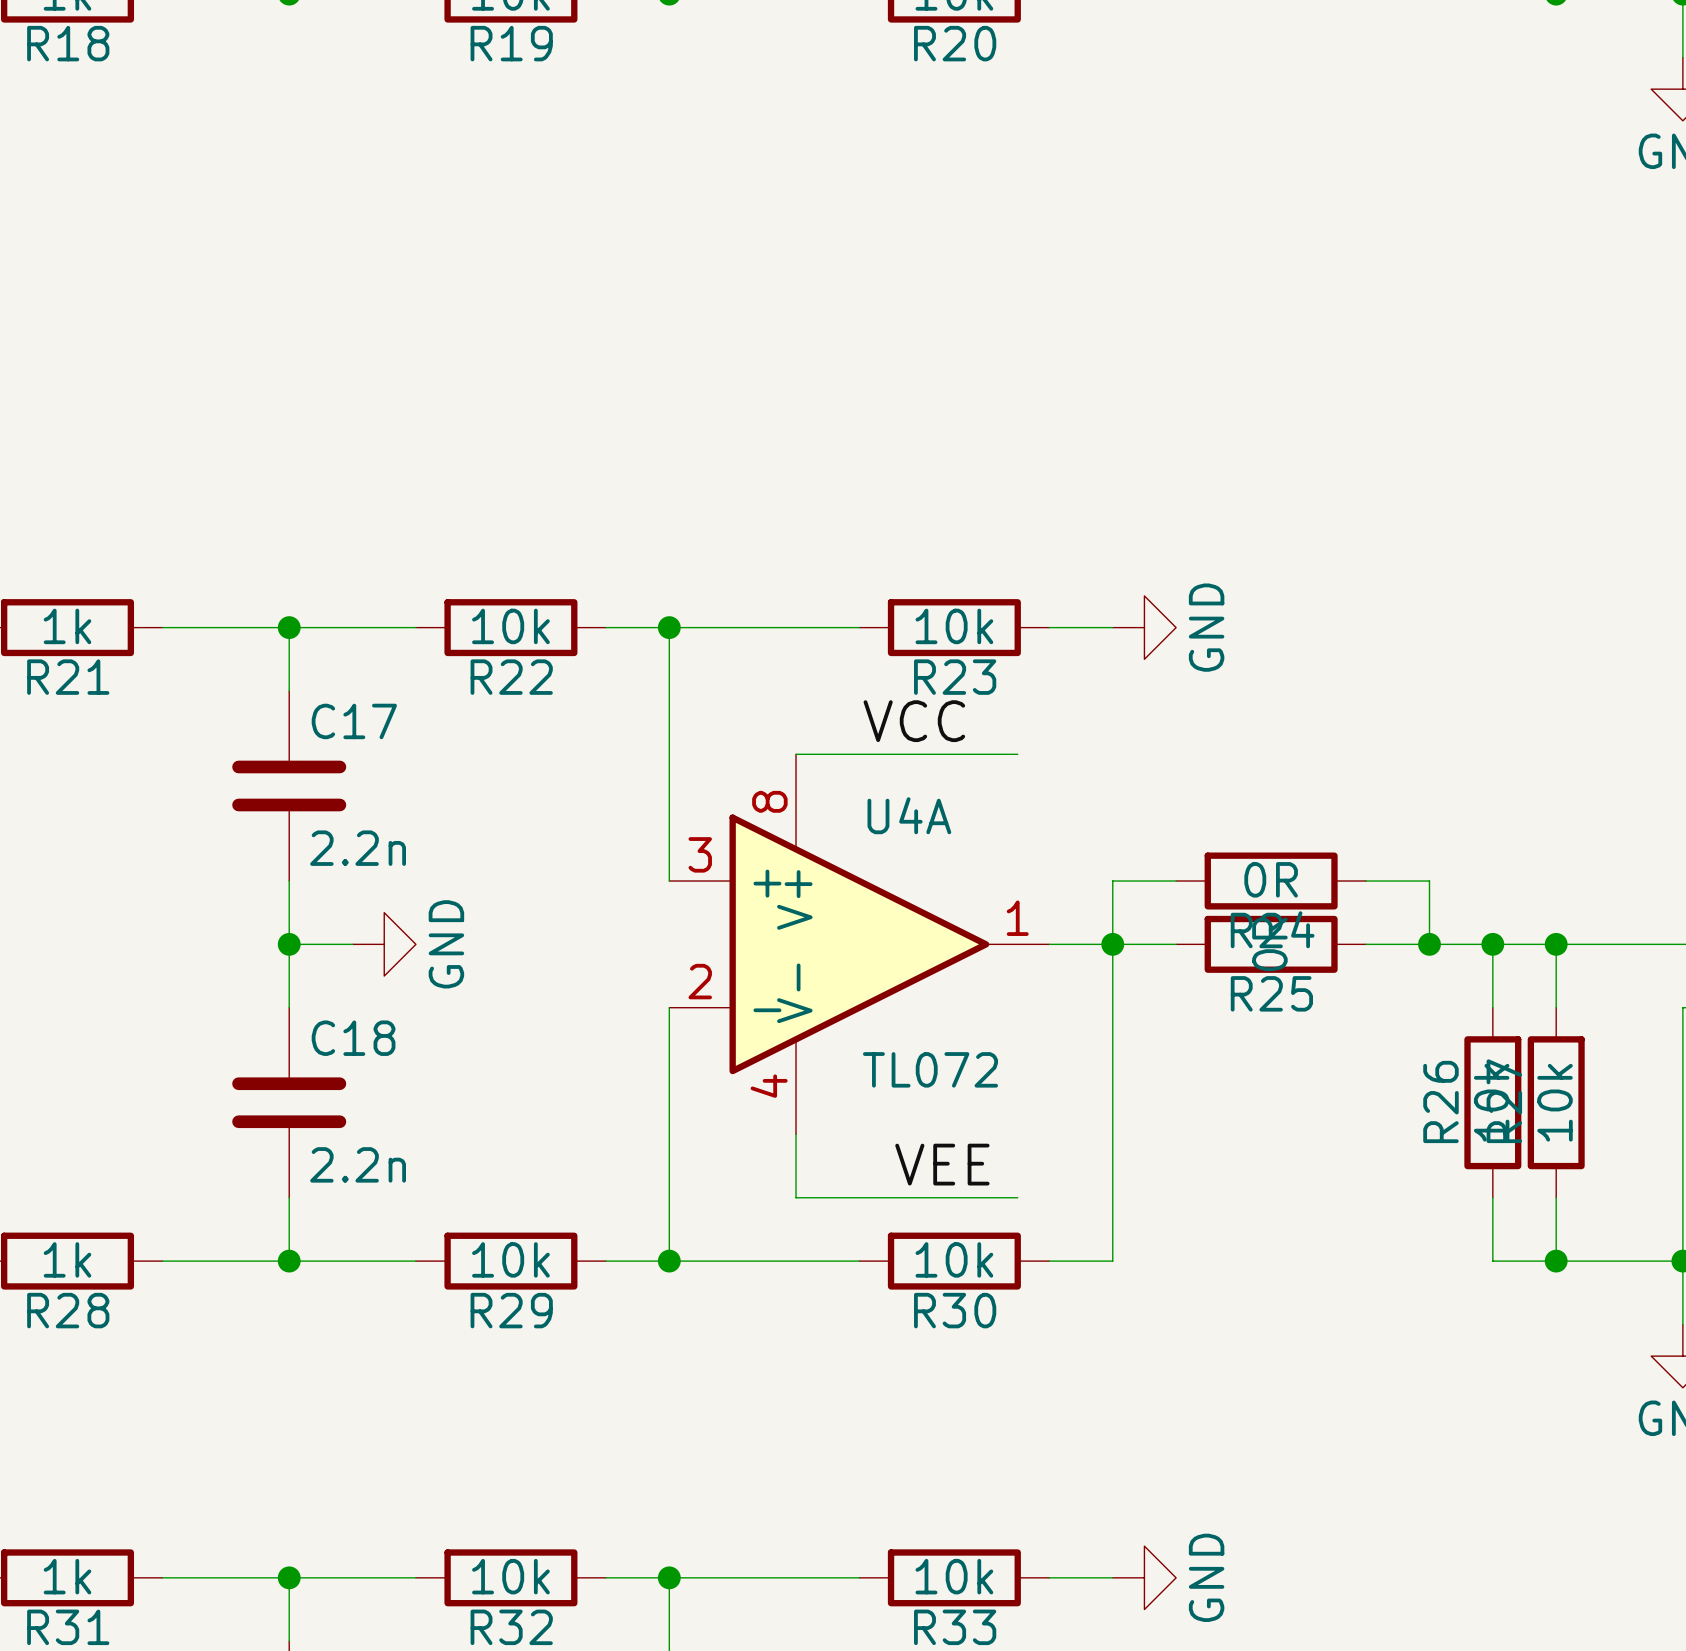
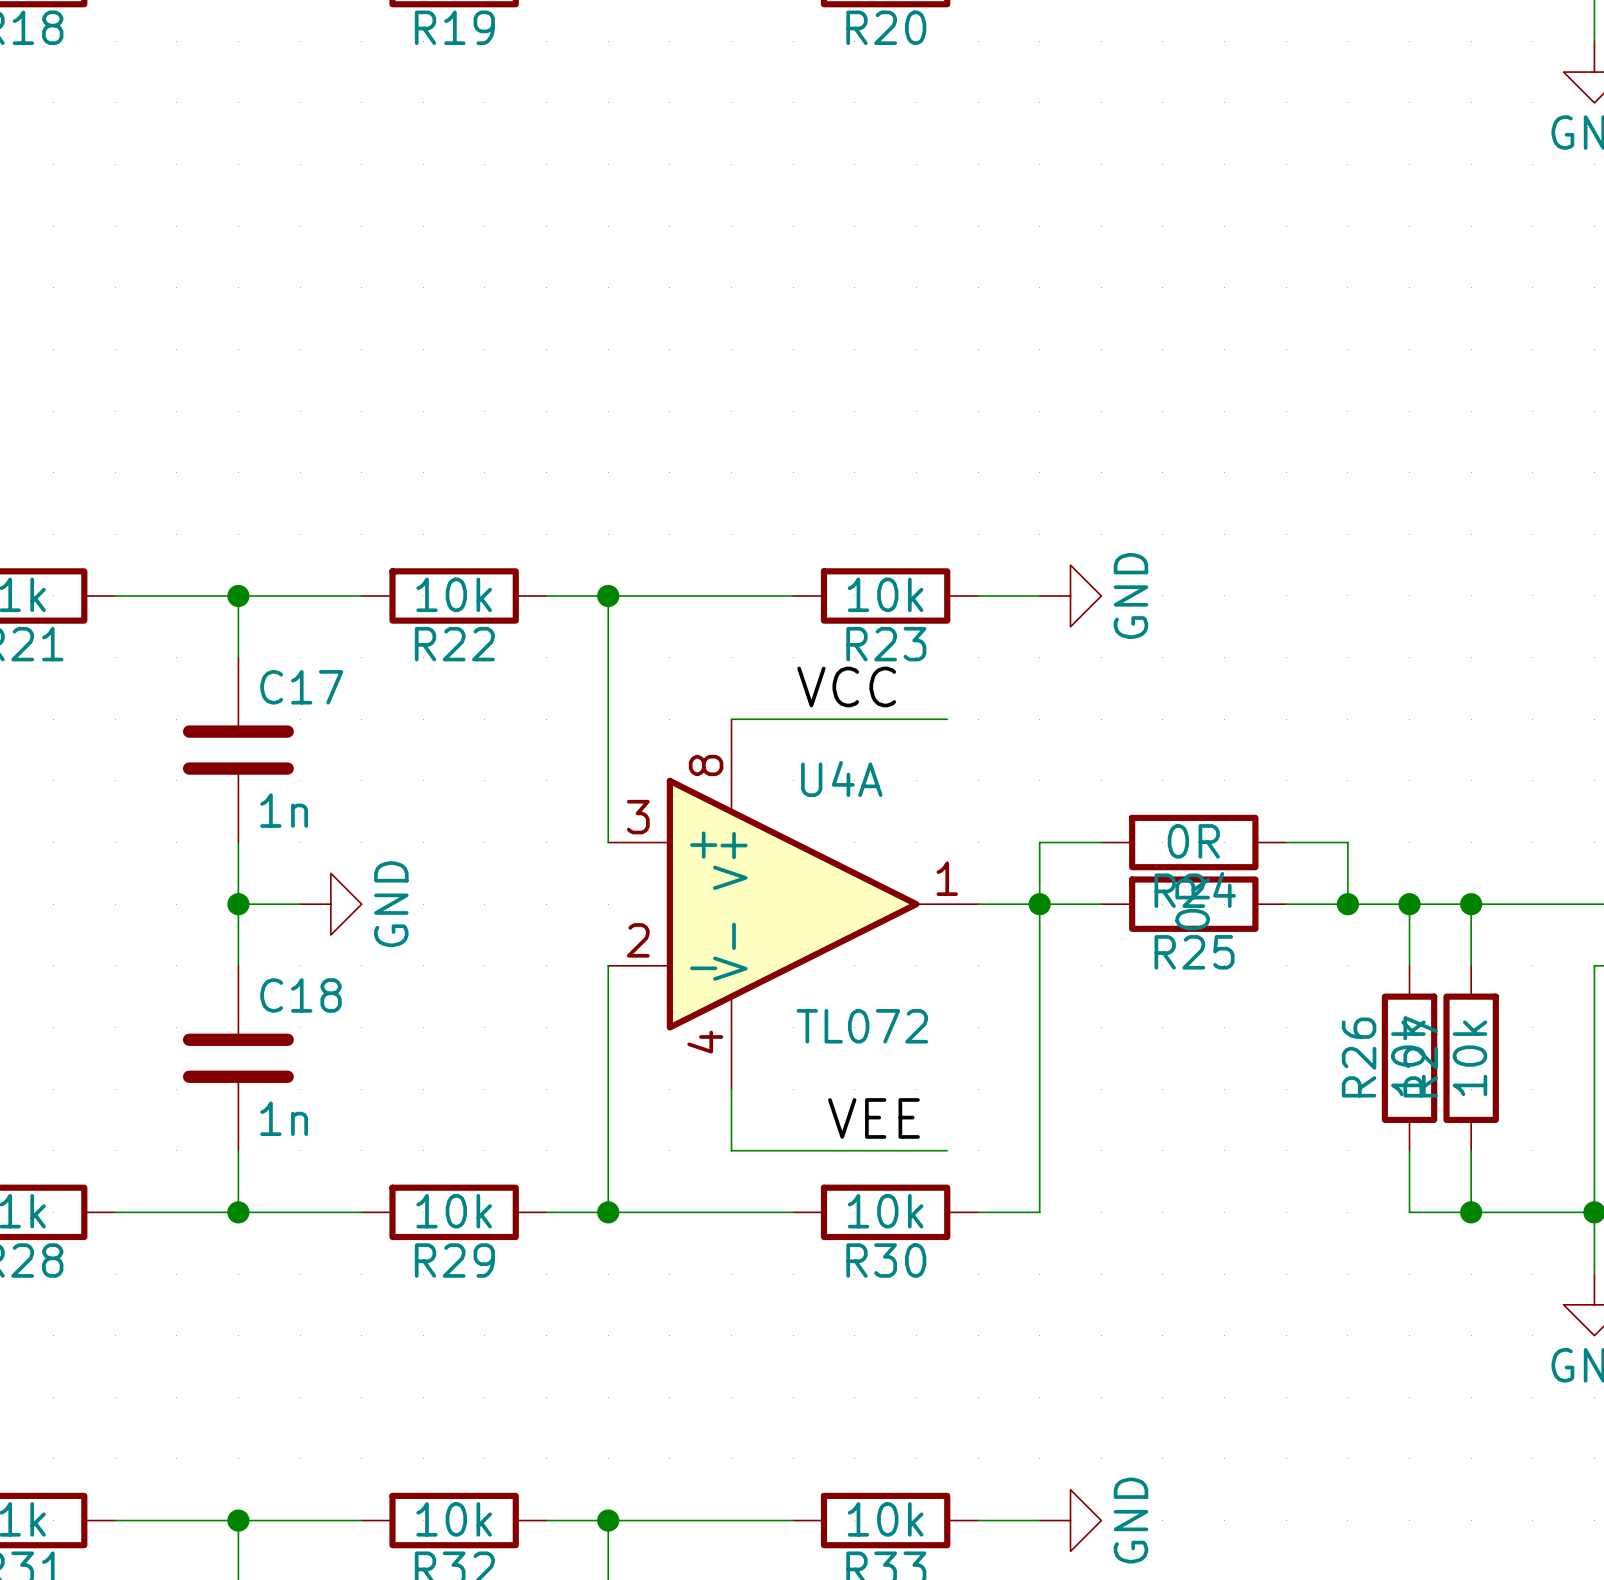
C17 value: 2.2n (358, 848) -> 1n (284, 810)
C18 value: 2.2n (358, 1164) -> 1n (284, 1118)

